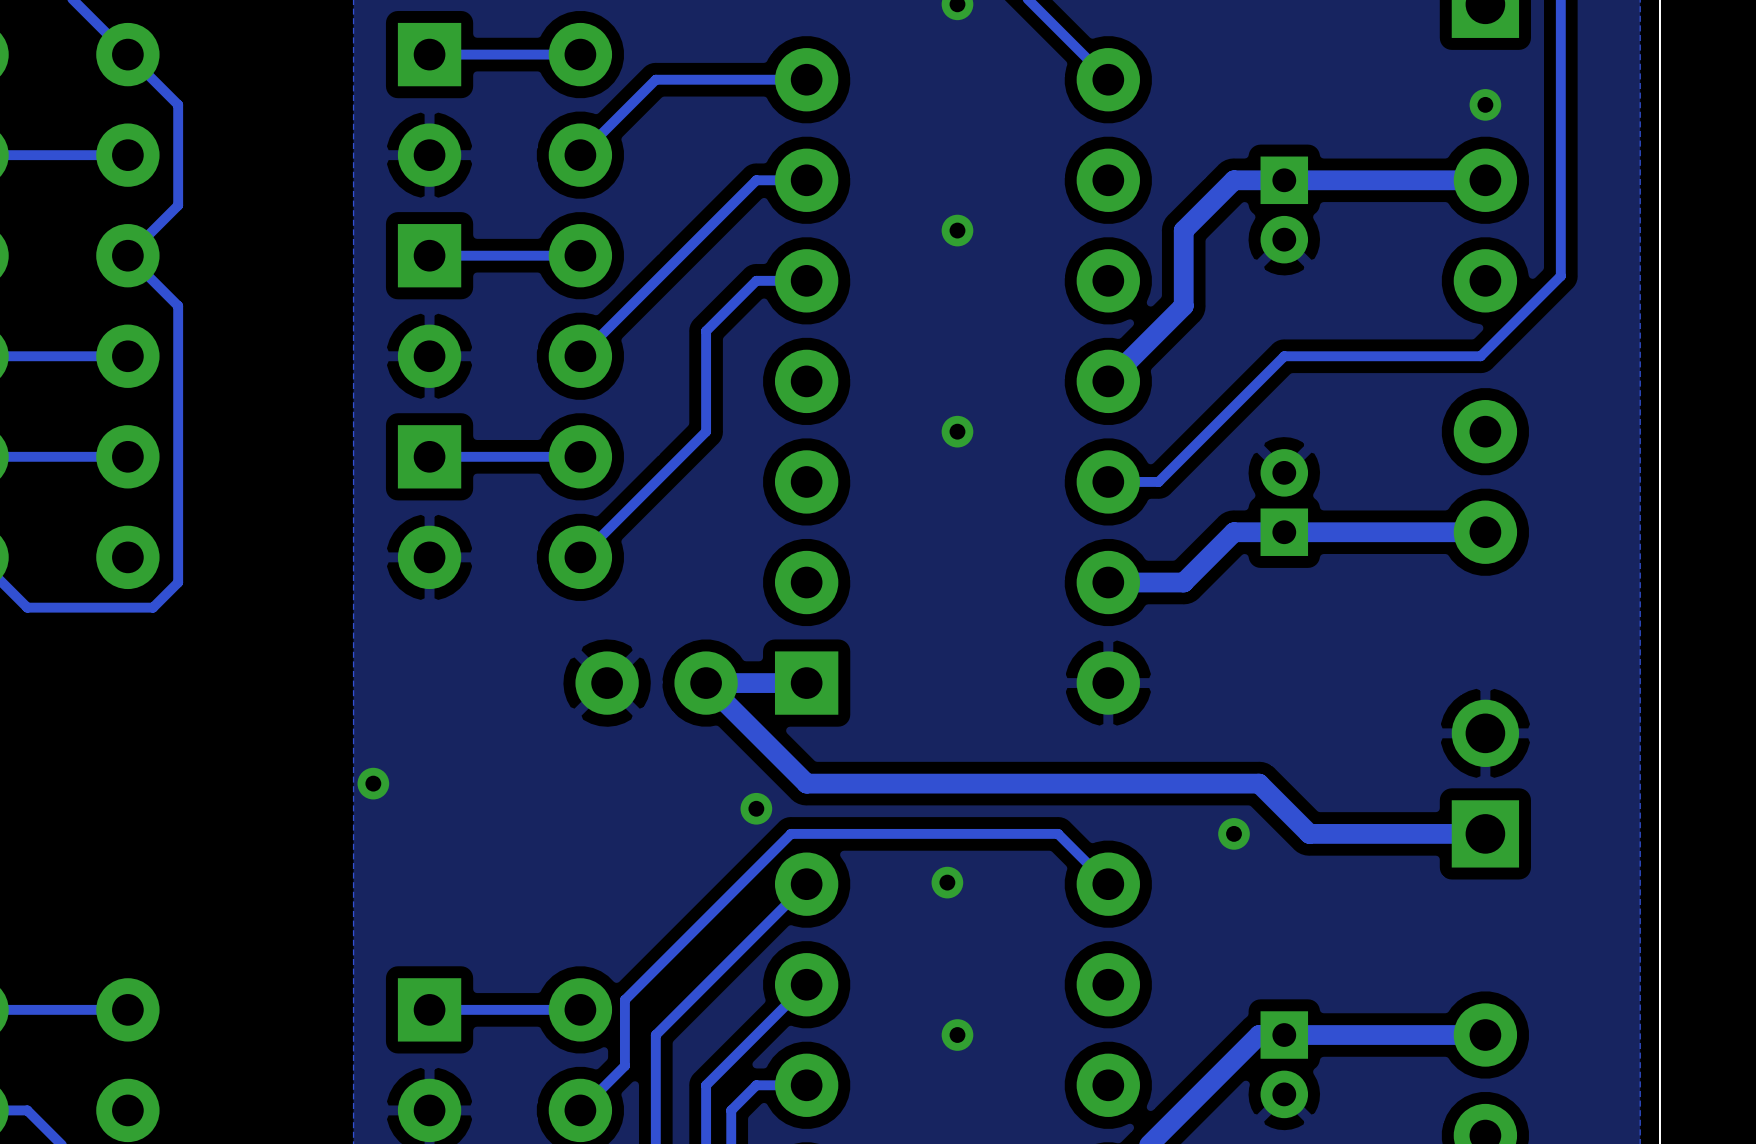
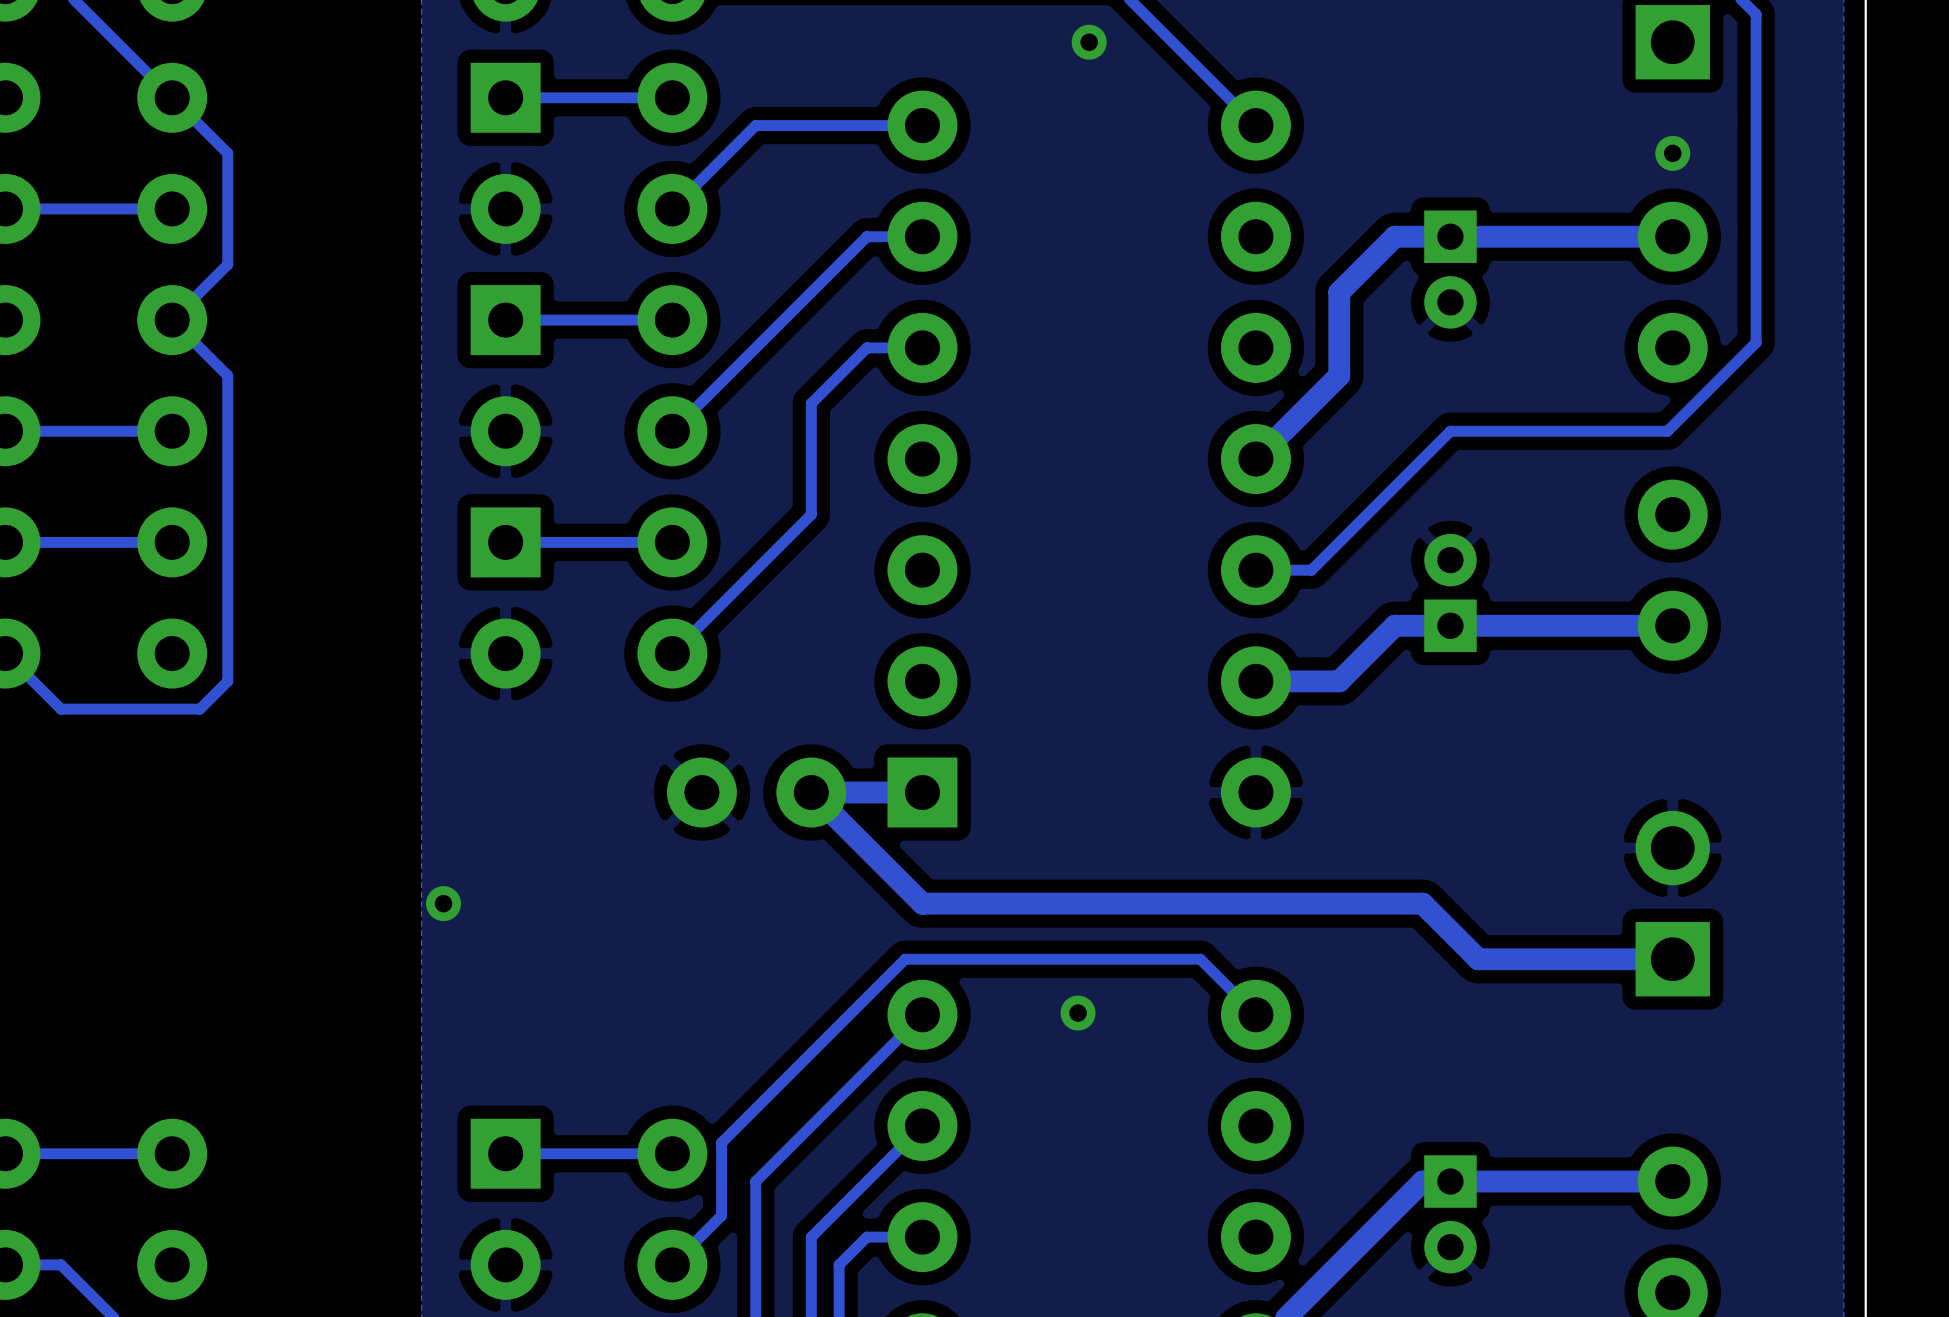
via: (957, 230) -> none
via: (957, 431) -> none
via: (756, 808) -> none
via: (1234, 833) -> none
via: (957, 1035) -> none

